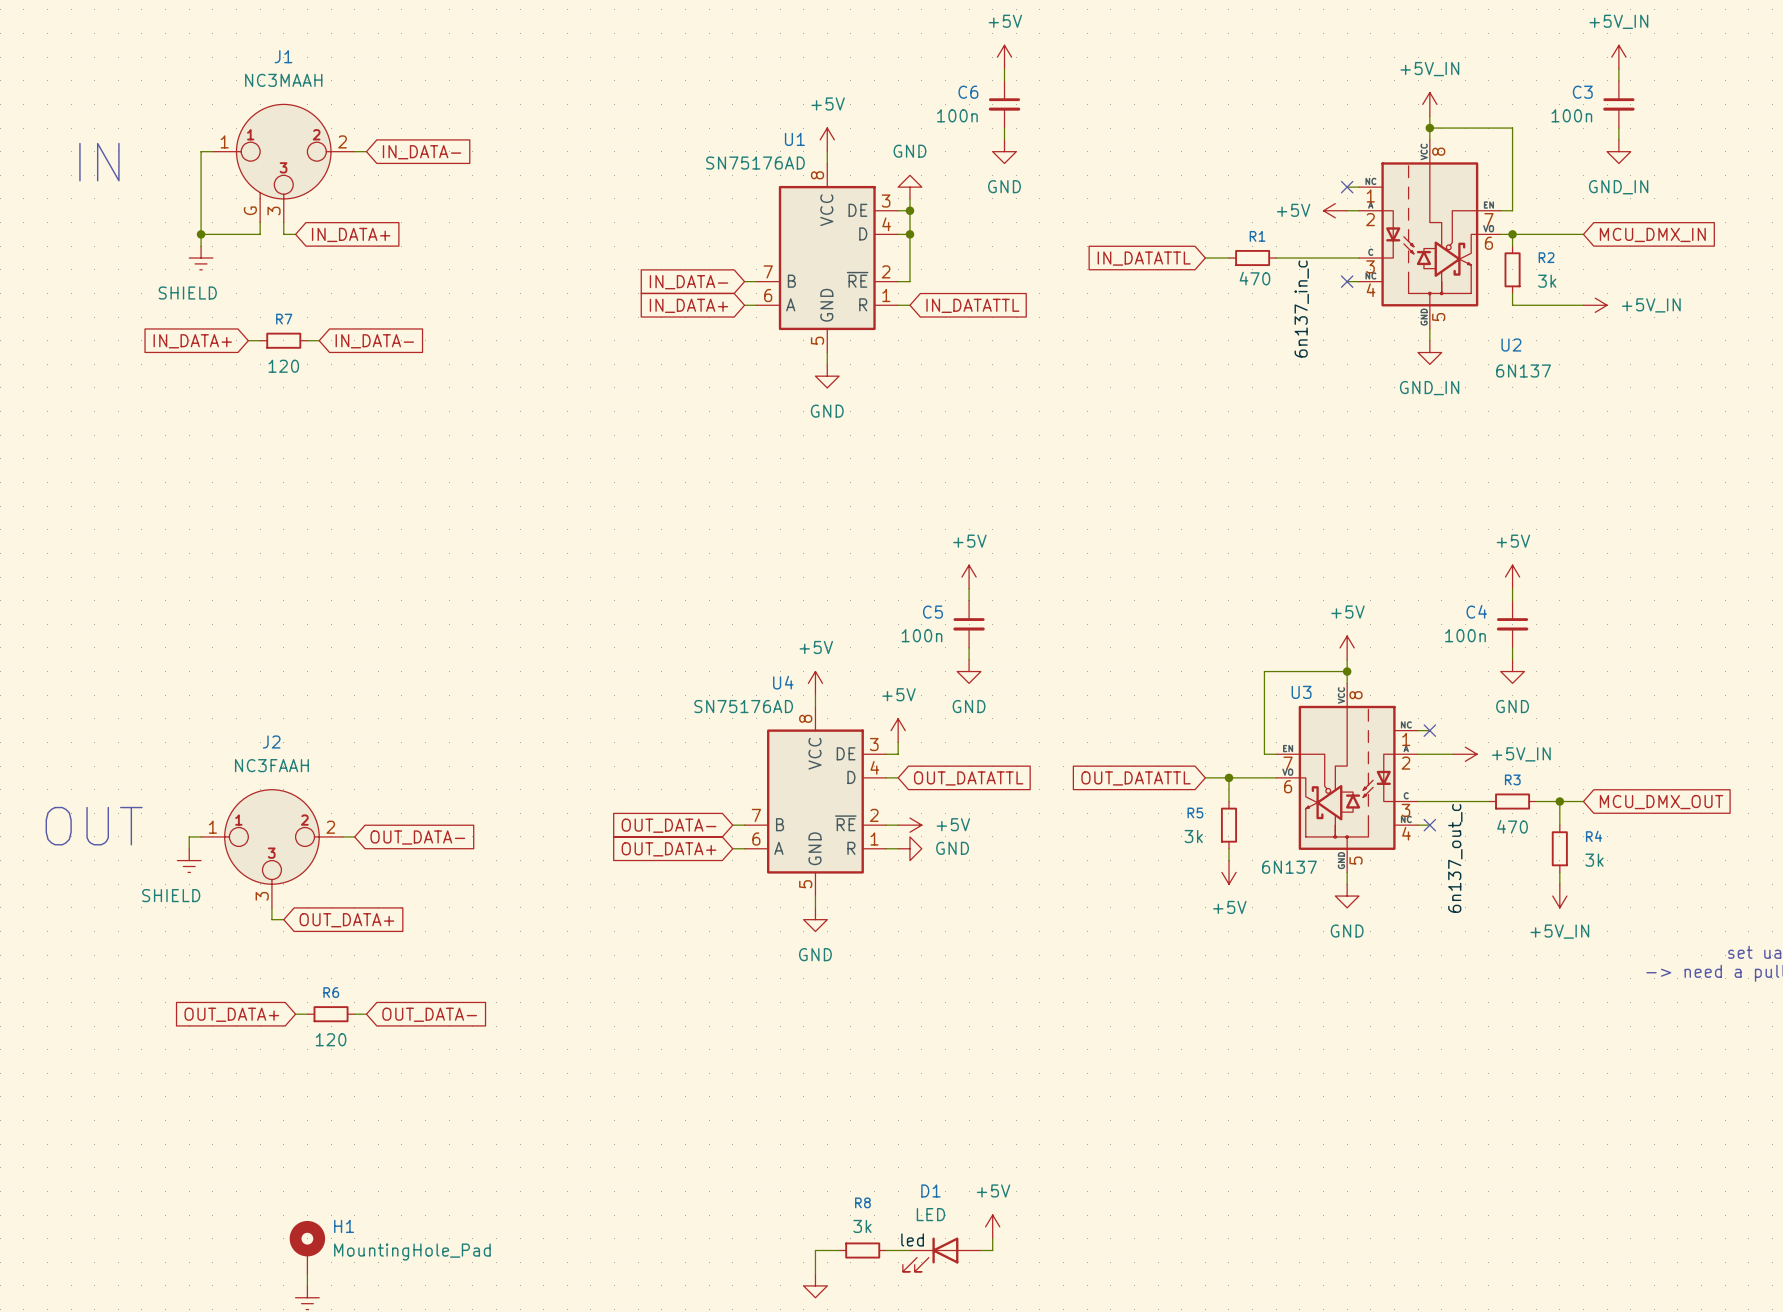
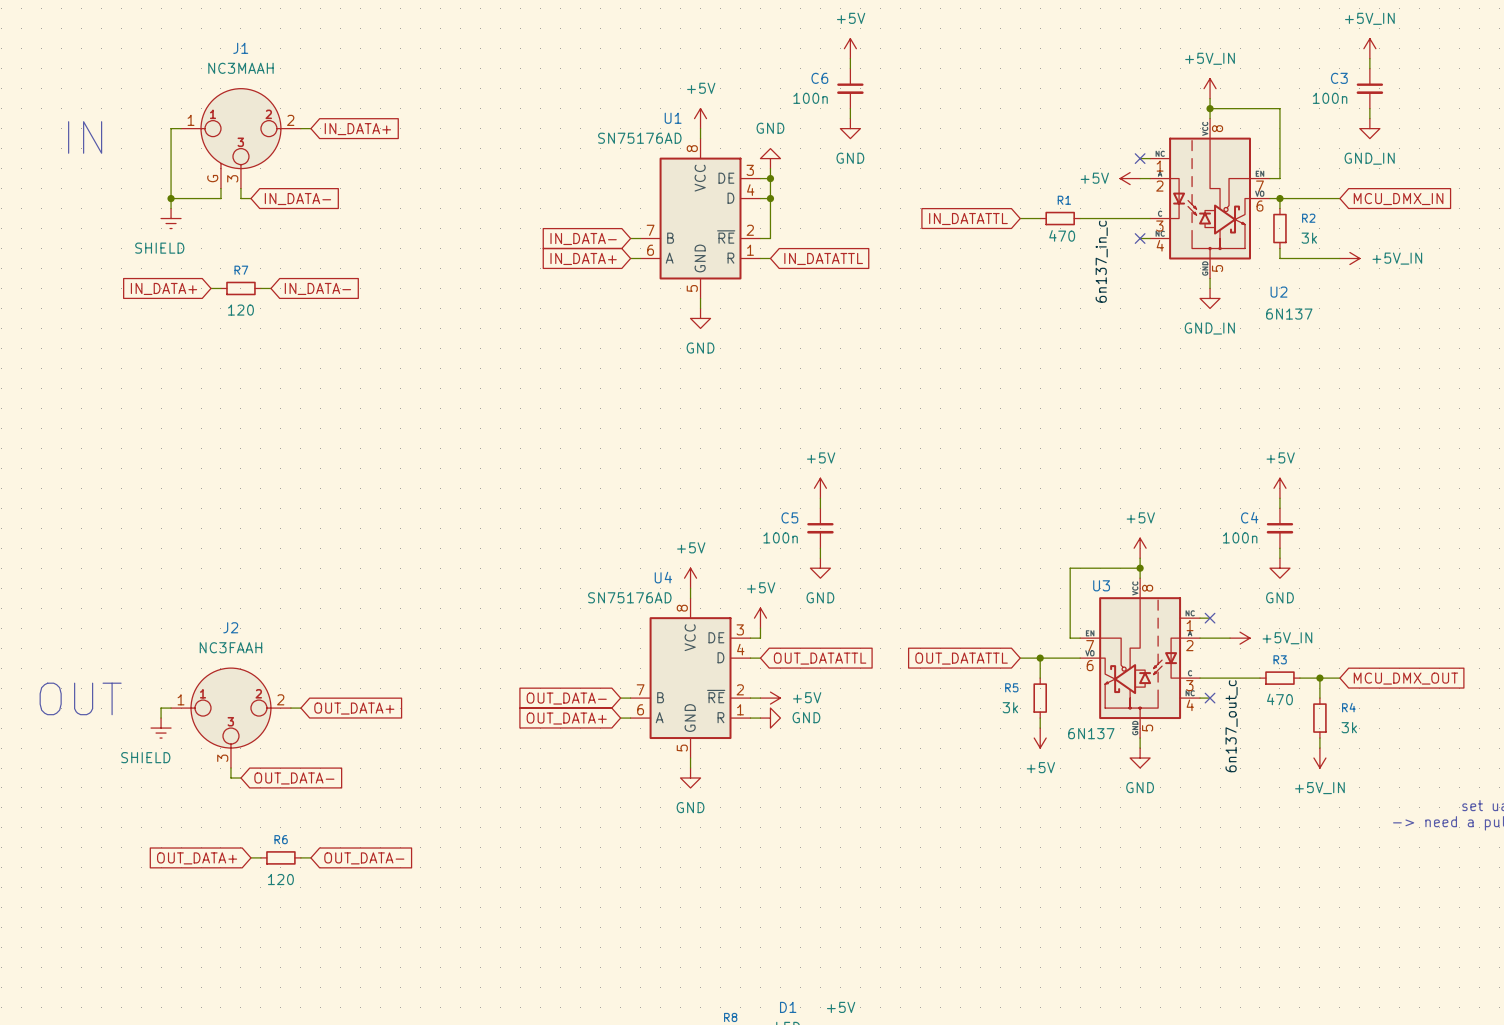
global label: IN_DATA- (422, 152) -> IN_DATA+ (357, 129)
global label: IN_DATA+ (351, 234) -> IN_DATA- (297, 199)
global label: OUT_DATA- (417, 837) -> OUT_DATA+ (354, 708)
global label: OUT_DATA+ (346, 920) -> OUT_DATA- (294, 778)

